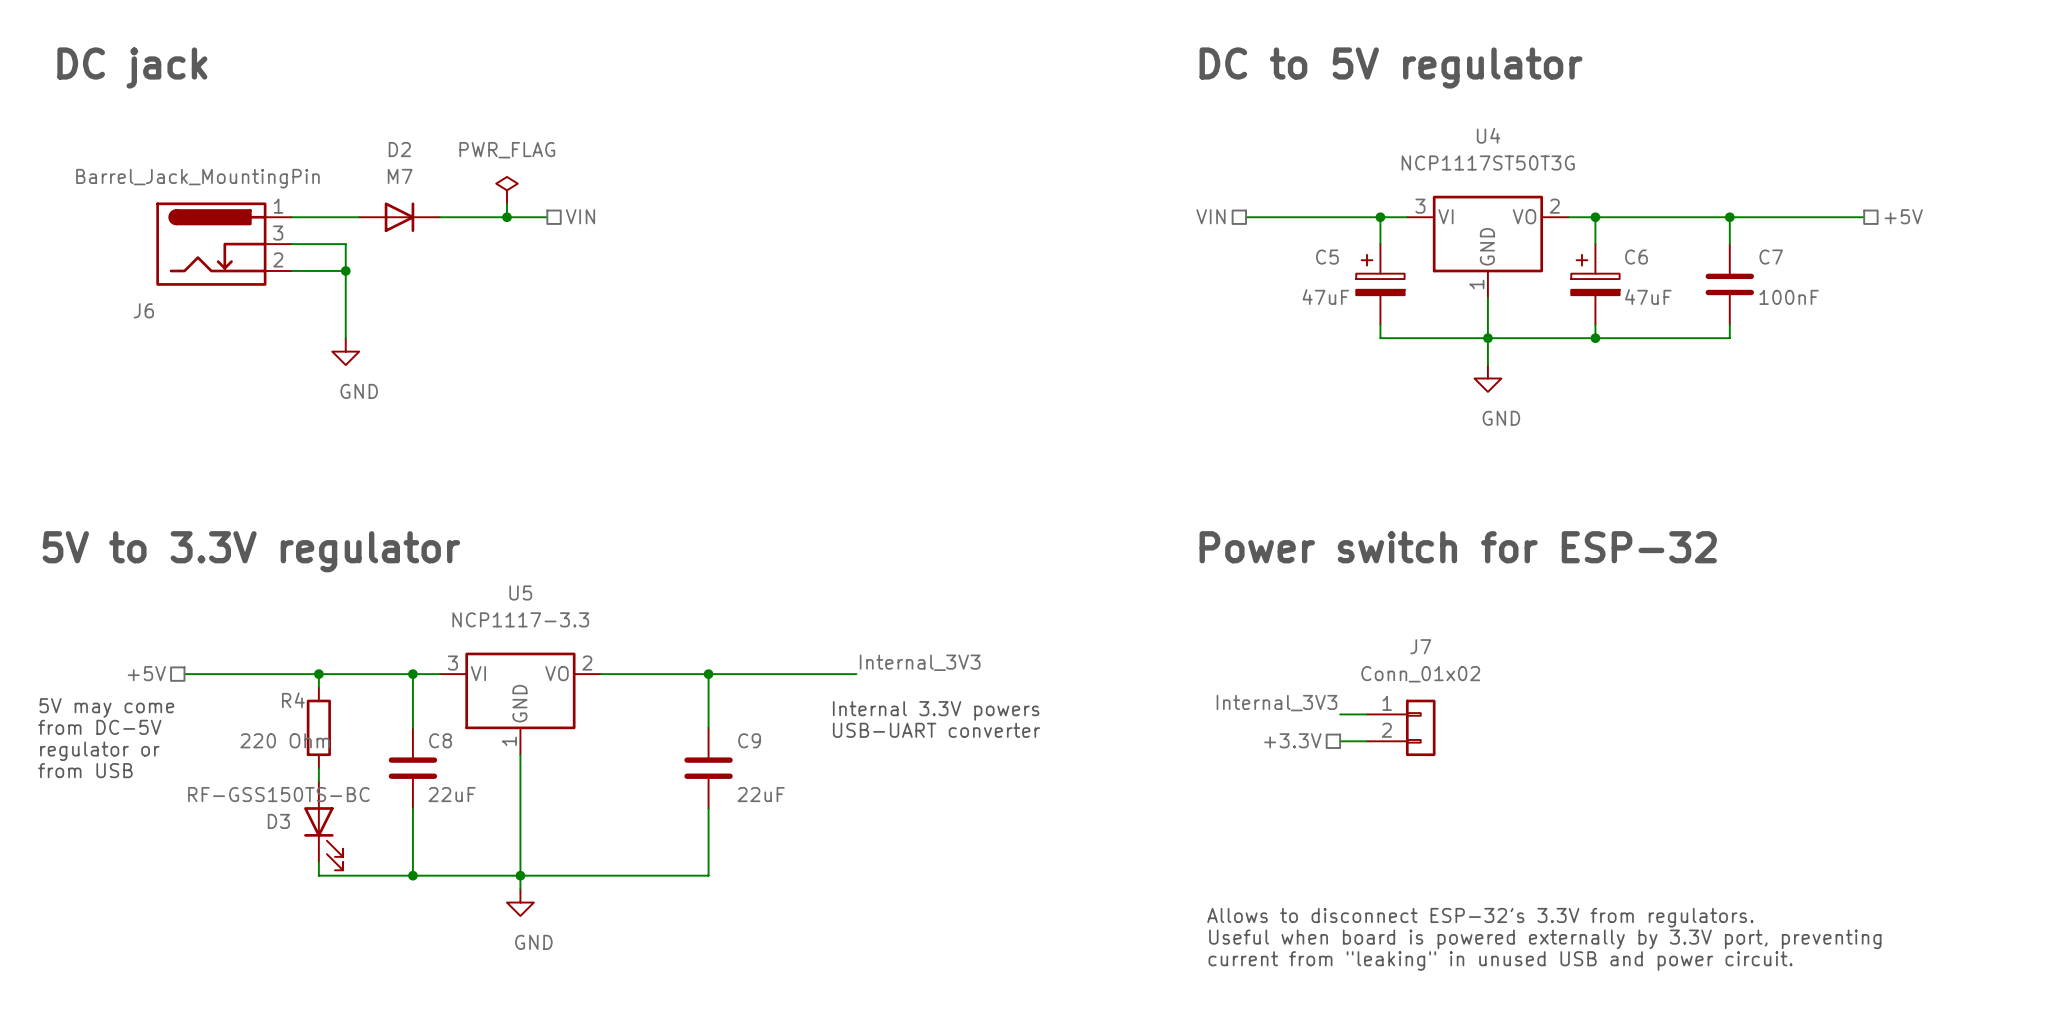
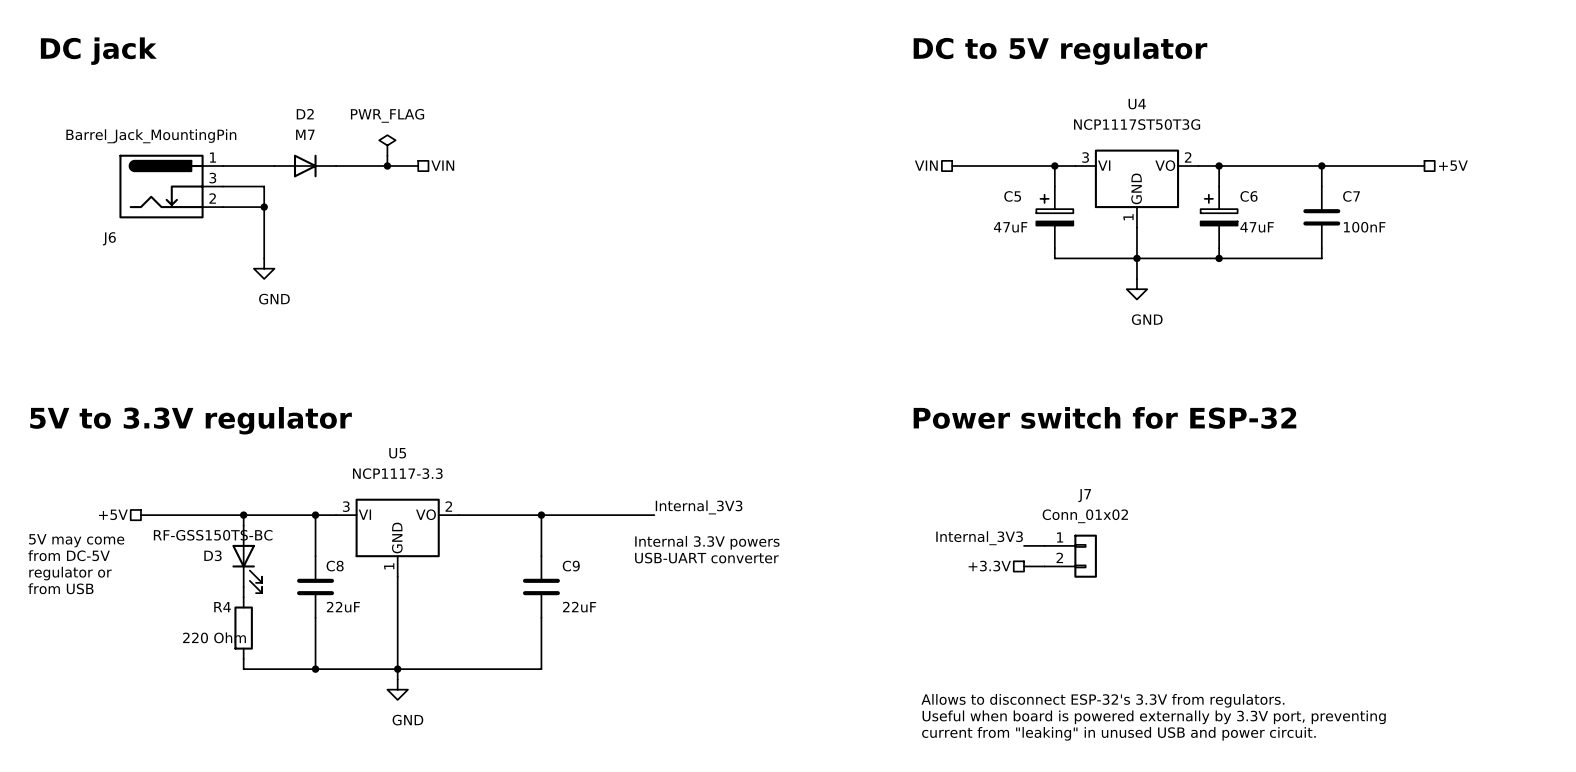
R4 position: (318, 727) -> (243, 628)
D3 position: (323, 825) -> (247, 559)

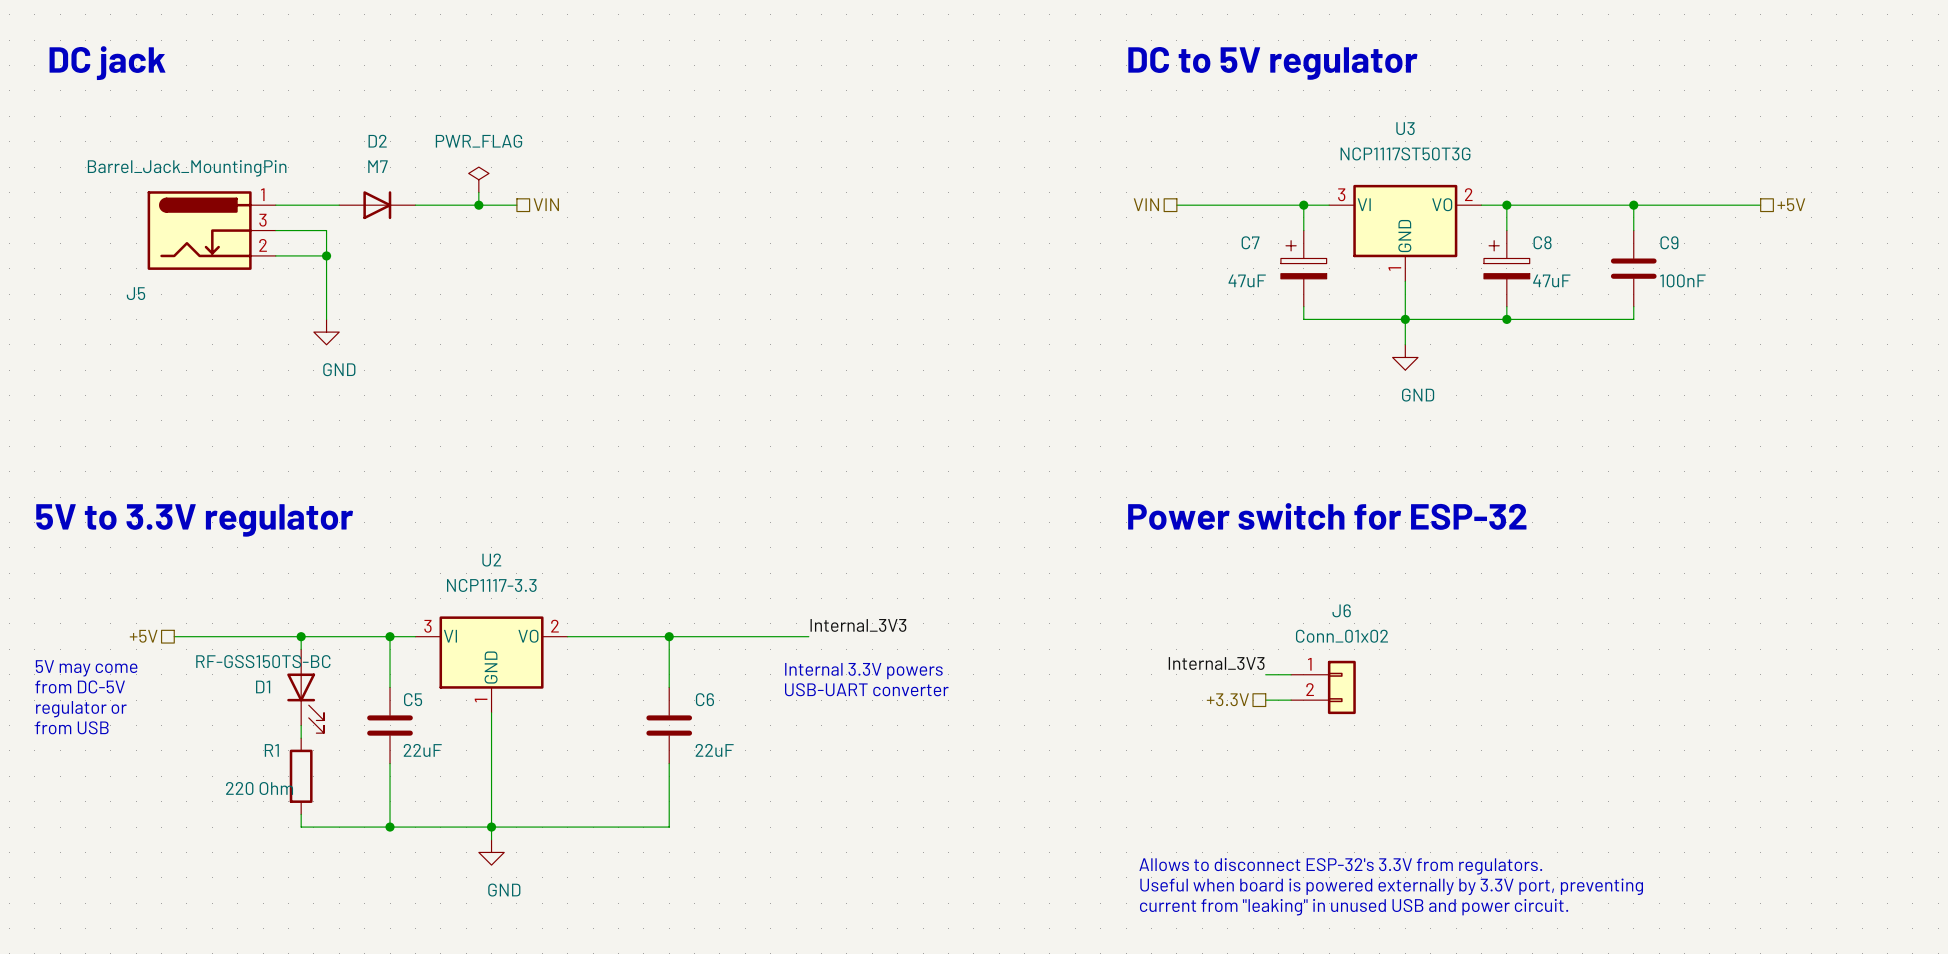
U4 name: U4 (1137, 104) -> U3 (1405, 128)
C5 name: C5 (1012, 196) -> C7 (1250, 242)
C6 name: C6 (1249, 196) -> C8 (1542, 242)
C7 name: C7 (1351, 196) -> C9 (1669, 242)
J6 name: J6 (109, 238) -> J5 (135, 293)
U5 name: U5 (397, 453) -> U2 (491, 560)
J7 name: J7 (1084, 495) -> J6 (1341, 610)
D3 name: D3 (212, 555) -> D1 (263, 686)
C8 name: C8 (335, 566) -> C5 (413, 699)
C9 name: C9 (571, 566) -> C6 (704, 699)
R4 name: R4 (222, 607) -> R1 (271, 750)

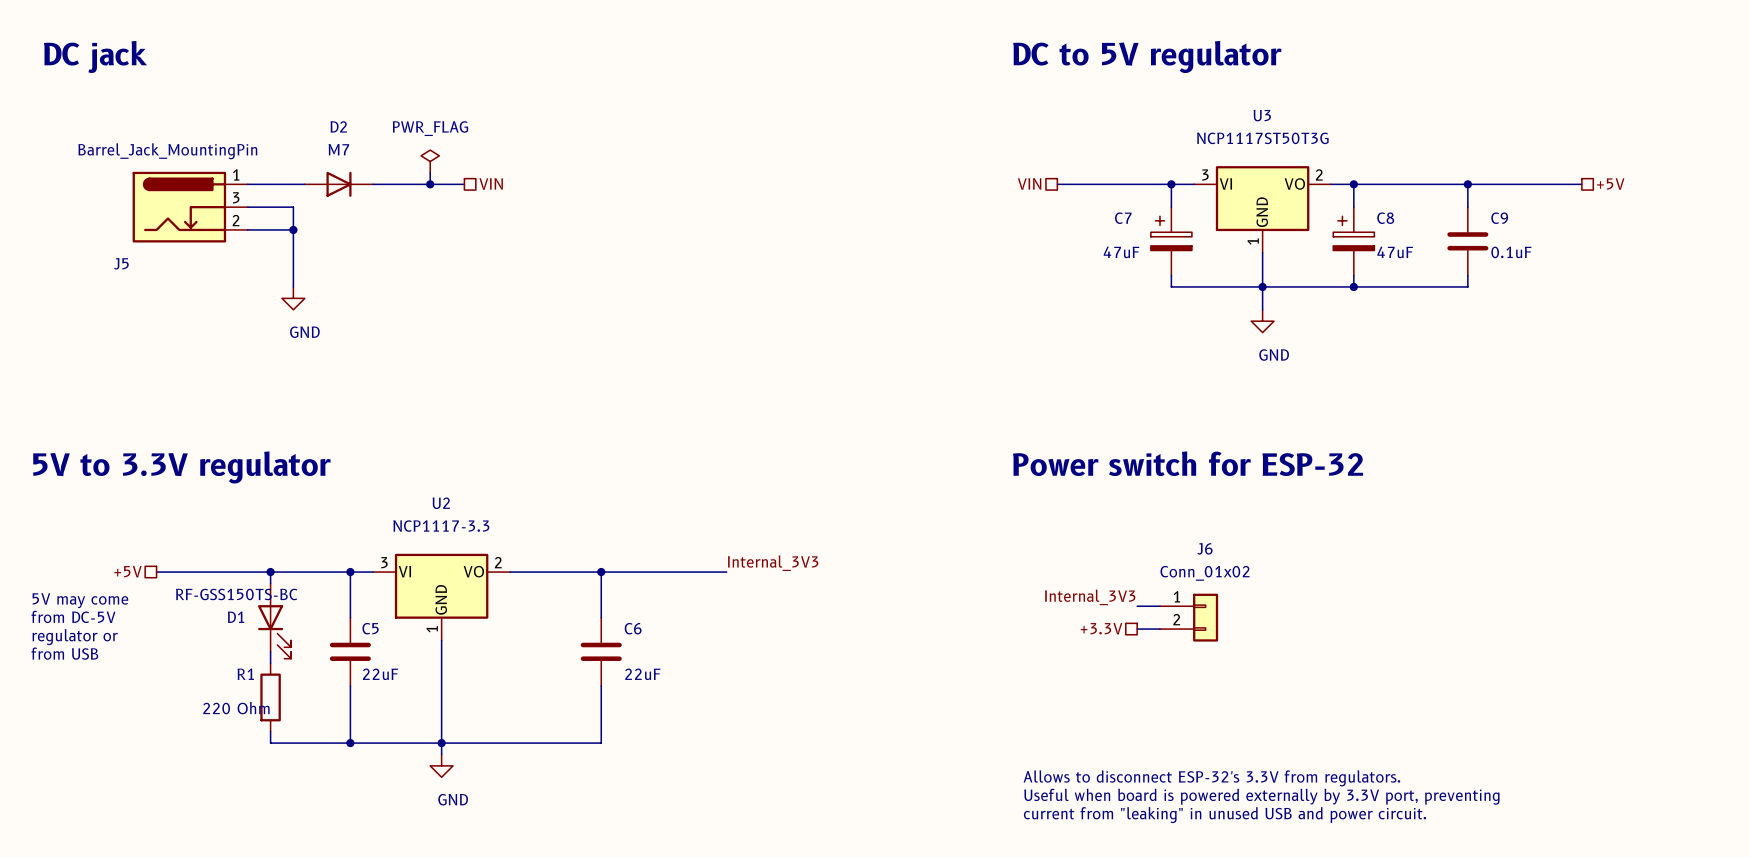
C9 value: 100nF (1682, 280) -> 0.1uF (1511, 252)
text: Internal 3.3V powers (863, 671) -> none
text: USB-UART converter (866, 689) -> none

